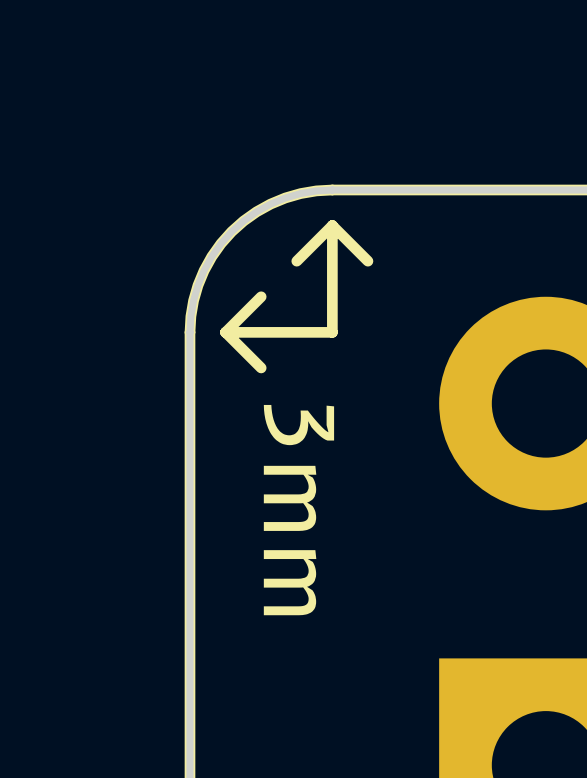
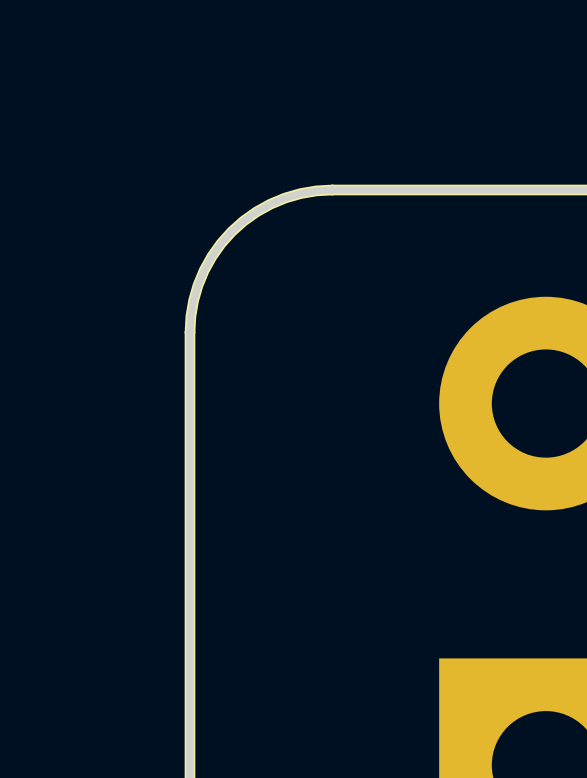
line: (332, 225) (296, 261) -> none
line: (332, 225) (367, 261) -> none
line: (332, 225) (332, 332) (225, 332) -> none
line: (261, 296) (225, 332) -> none
line: (225, 332) (261, 367) -> none
text: 3mm (298, 510) -> none

